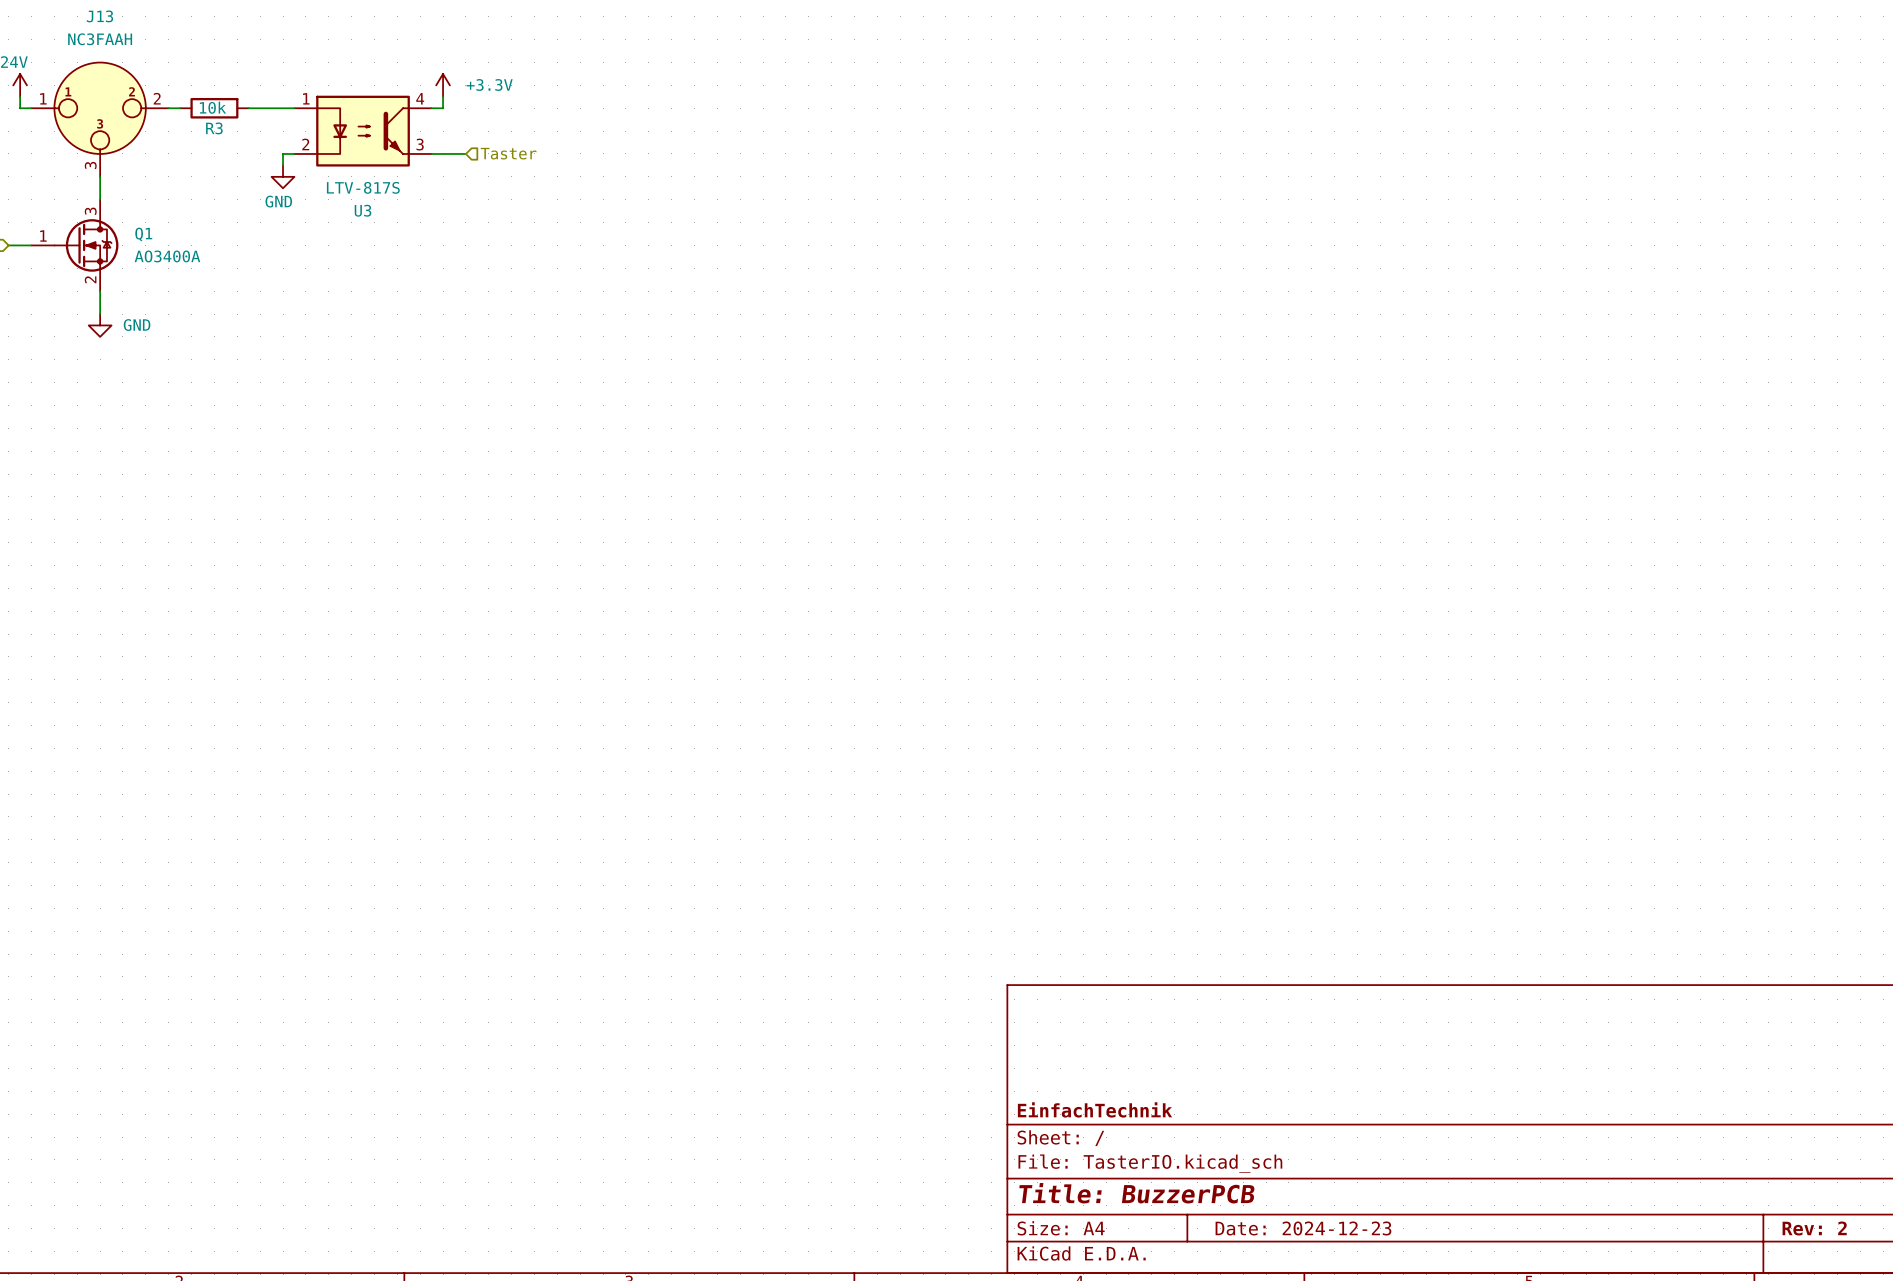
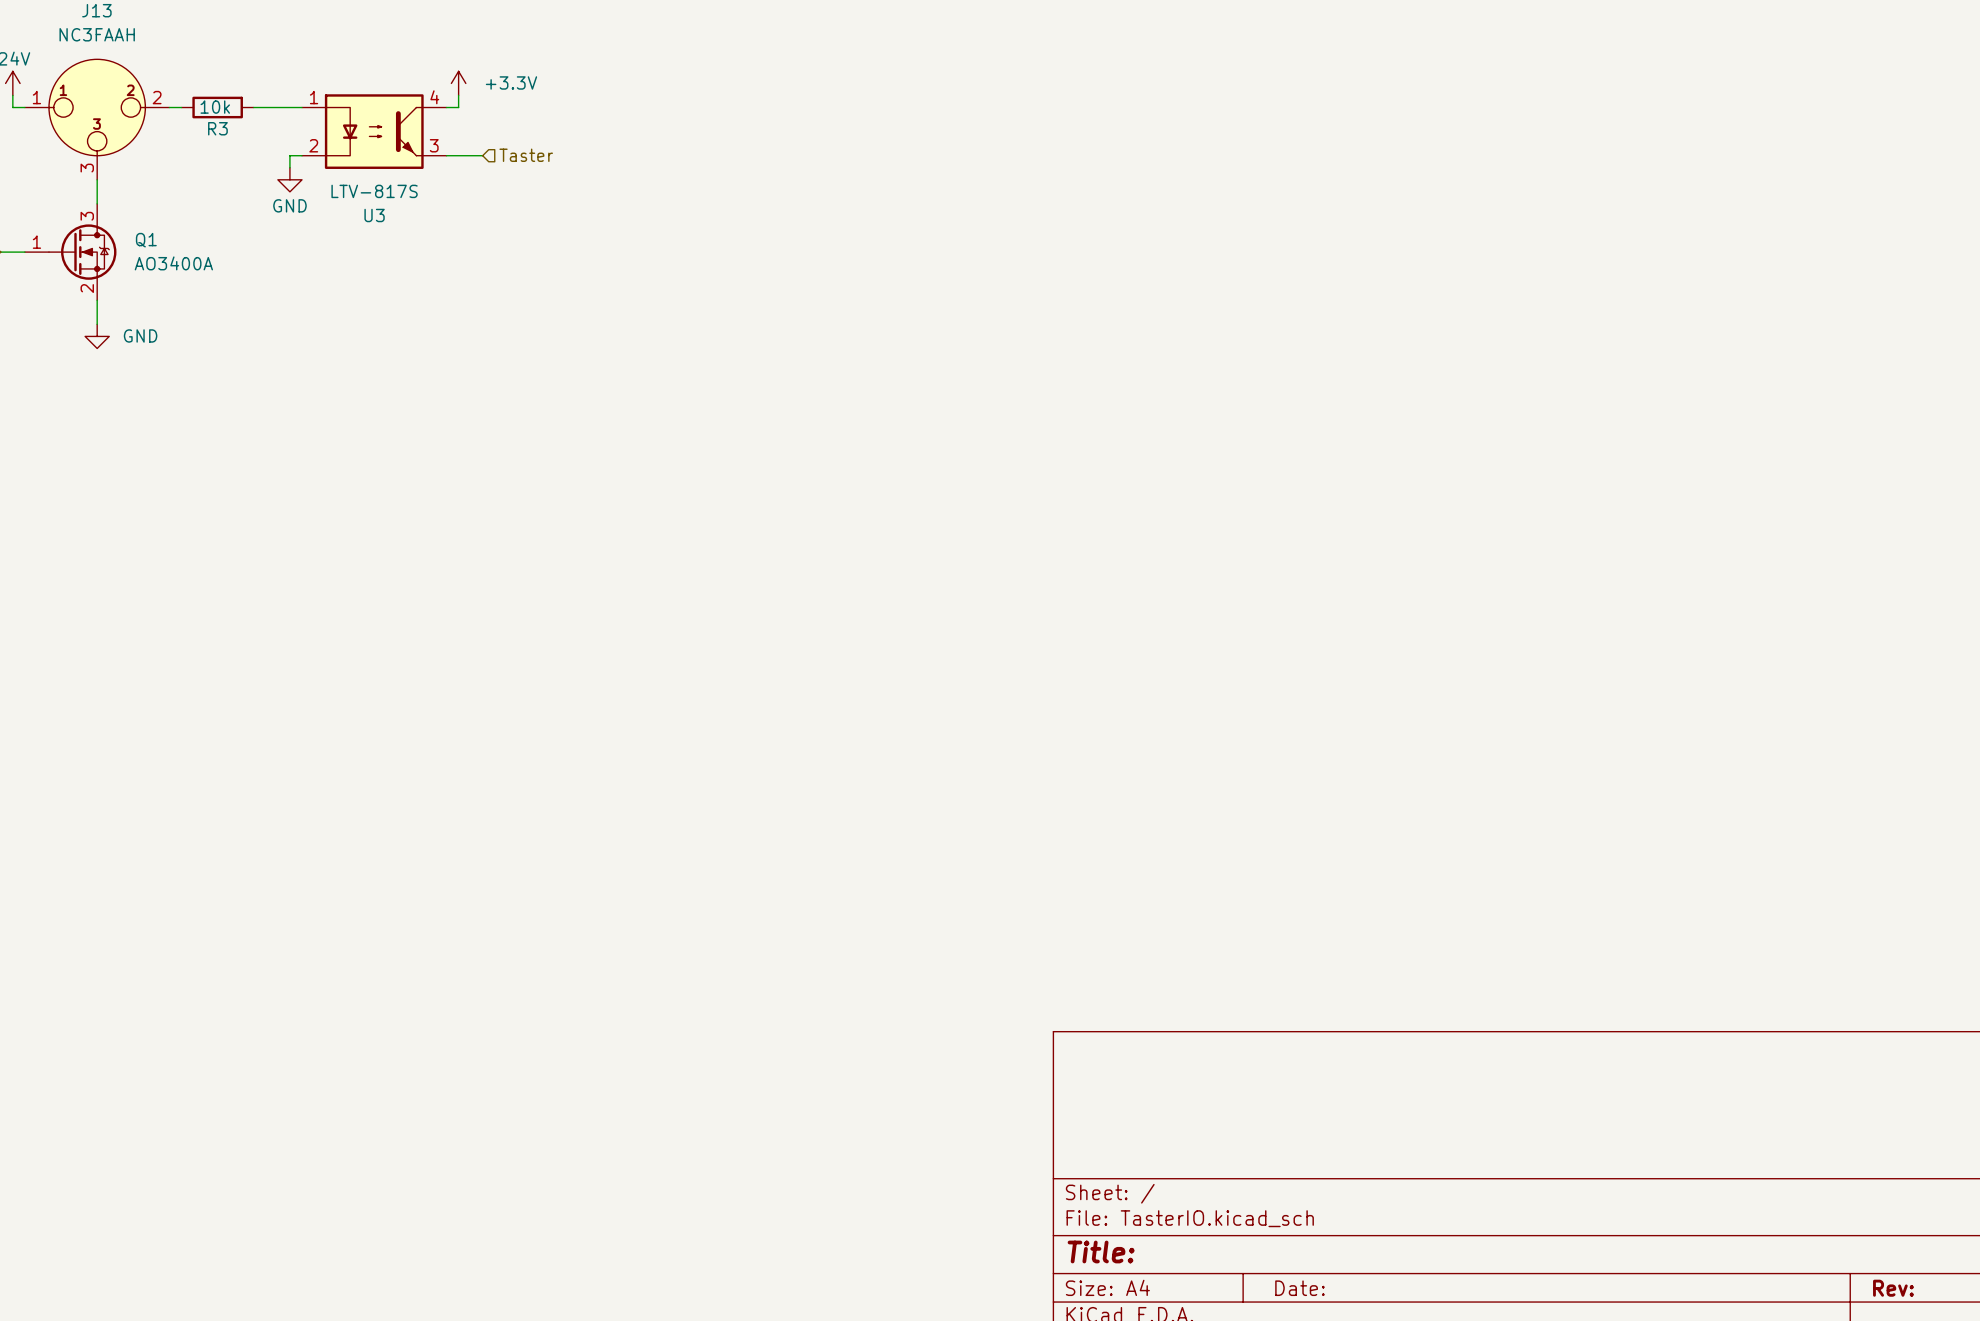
title block: EinfachTechnik (1094, 1109) -> none
title block: Title: BuzzerPCB (1136, 1193) -> Title: (1101, 1251)
title block: Date: 2024-12-23 (1303, 1228) -> Date: (1299, 1288)
title block: Rev: 2 (1814, 1228) -> Rev: (1893, 1288)

